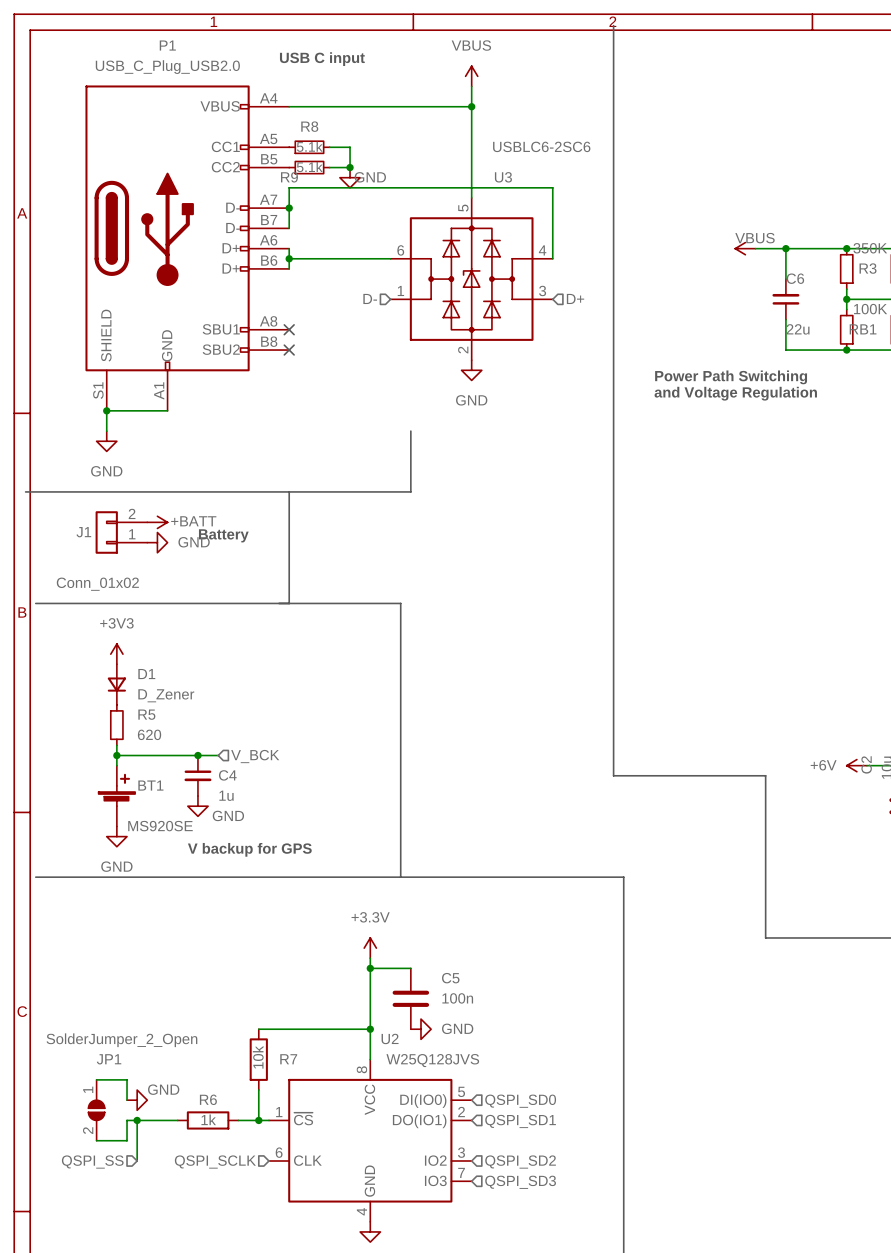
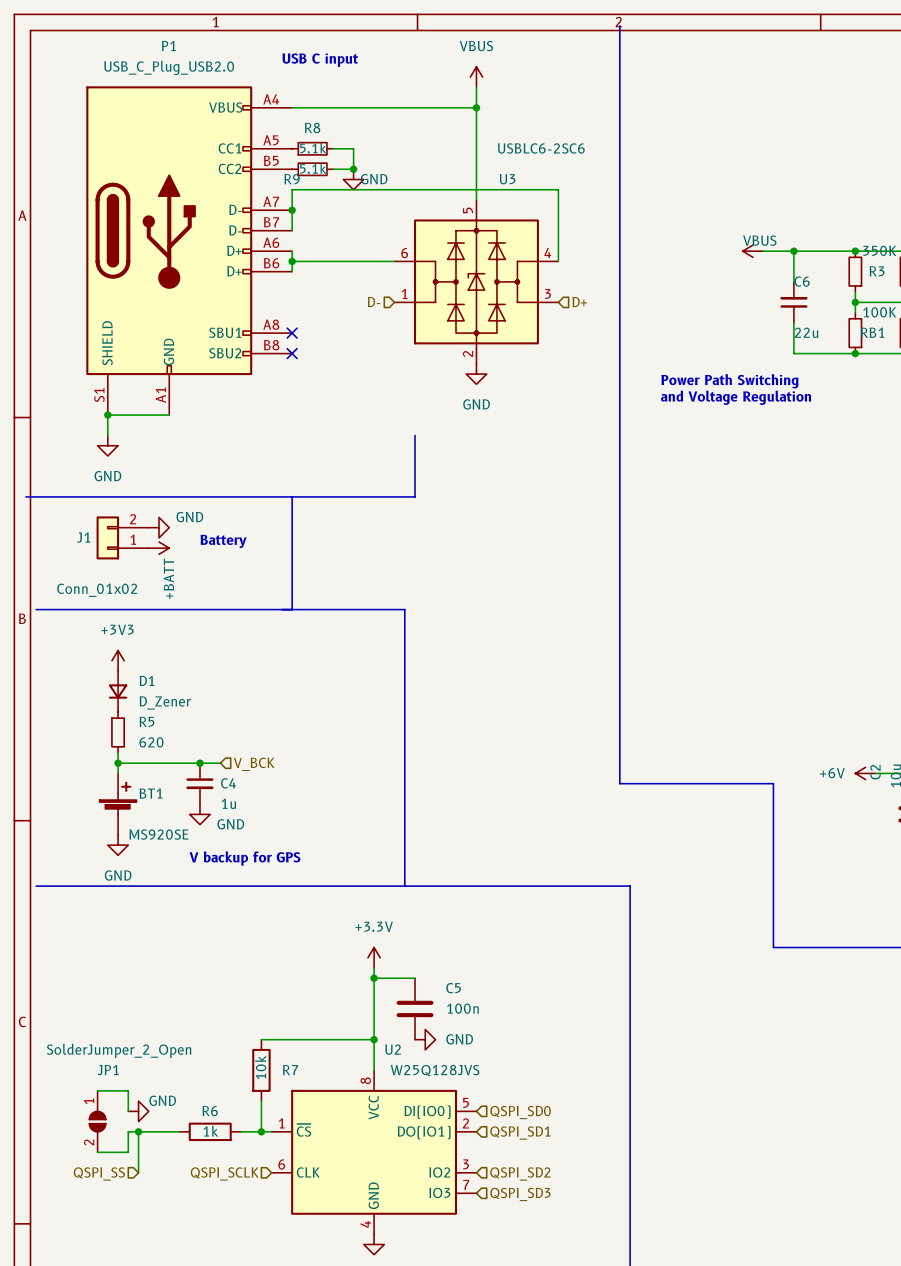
power symbol: +BATT (157, 522) -> GND (159, 527)
power symbol: GND (157, 542) -> +BATT (159, 548)

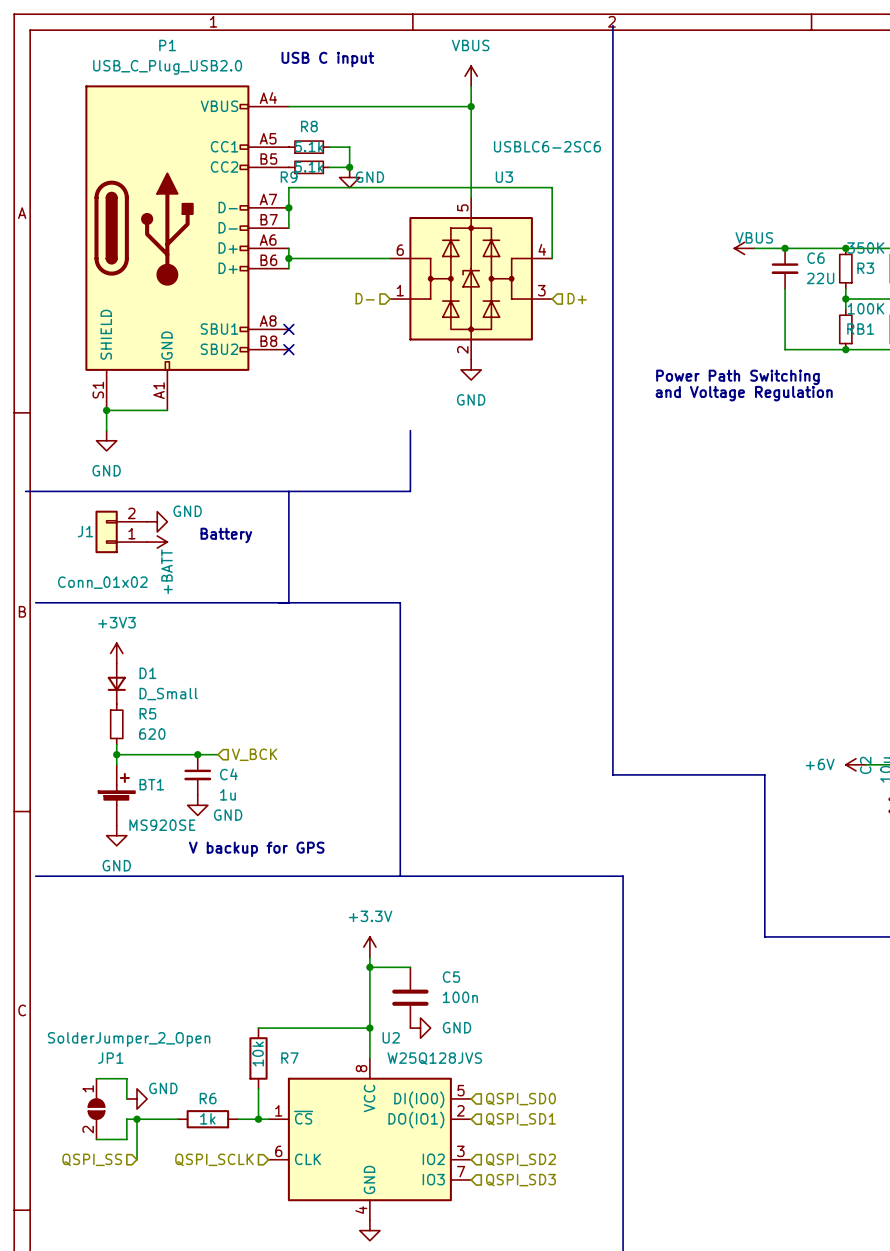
C6 name position: C6 (802, 281) -> C6 (816, 258)
C6 rotation: 0° (793, 302) -> 180° (785, 268)
C6 position: (793, 302) -> (785, 268)
C6 value: 22u (806, 332) -> 22U (820, 278)
D1 value: D_Zener (165, 702) -> D_Small (168, 694)

